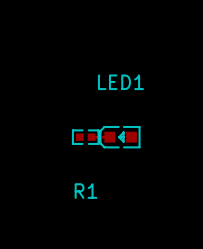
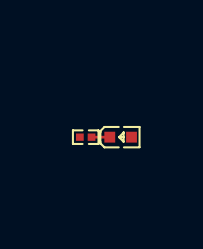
LED1 name: LED1 (120, 82) -> none
R1 name: R1 (86, 191) -> none

